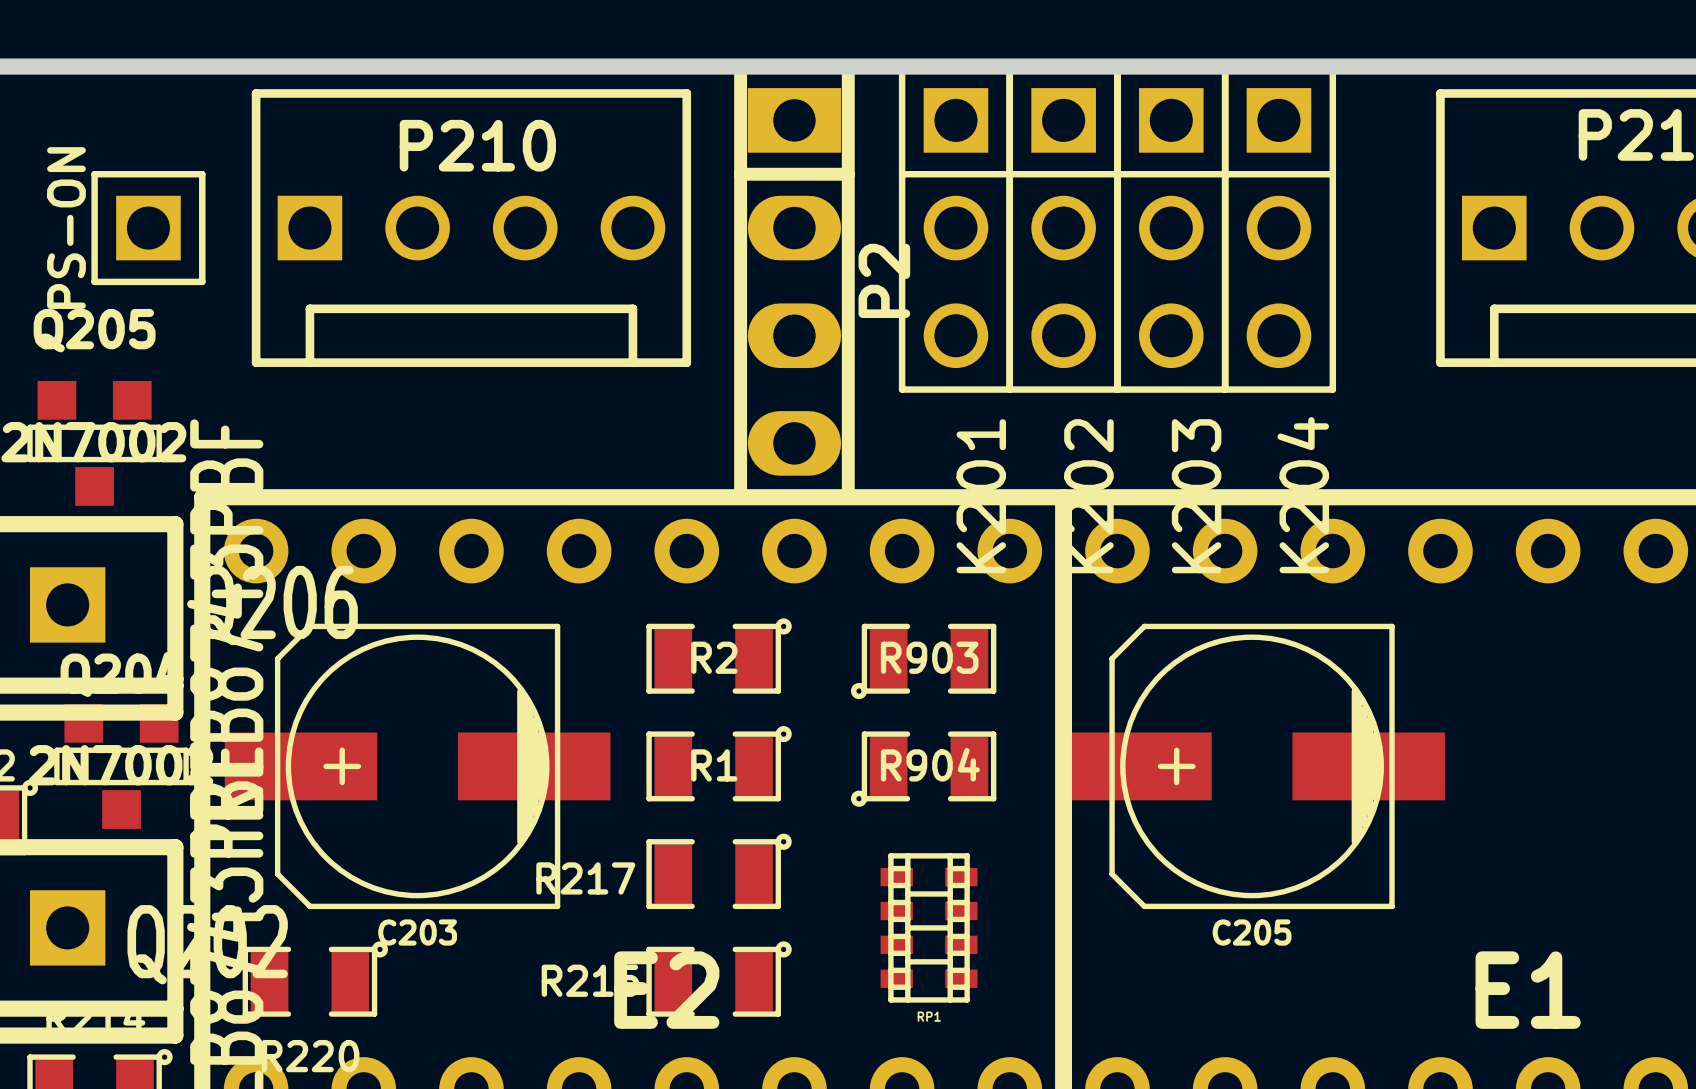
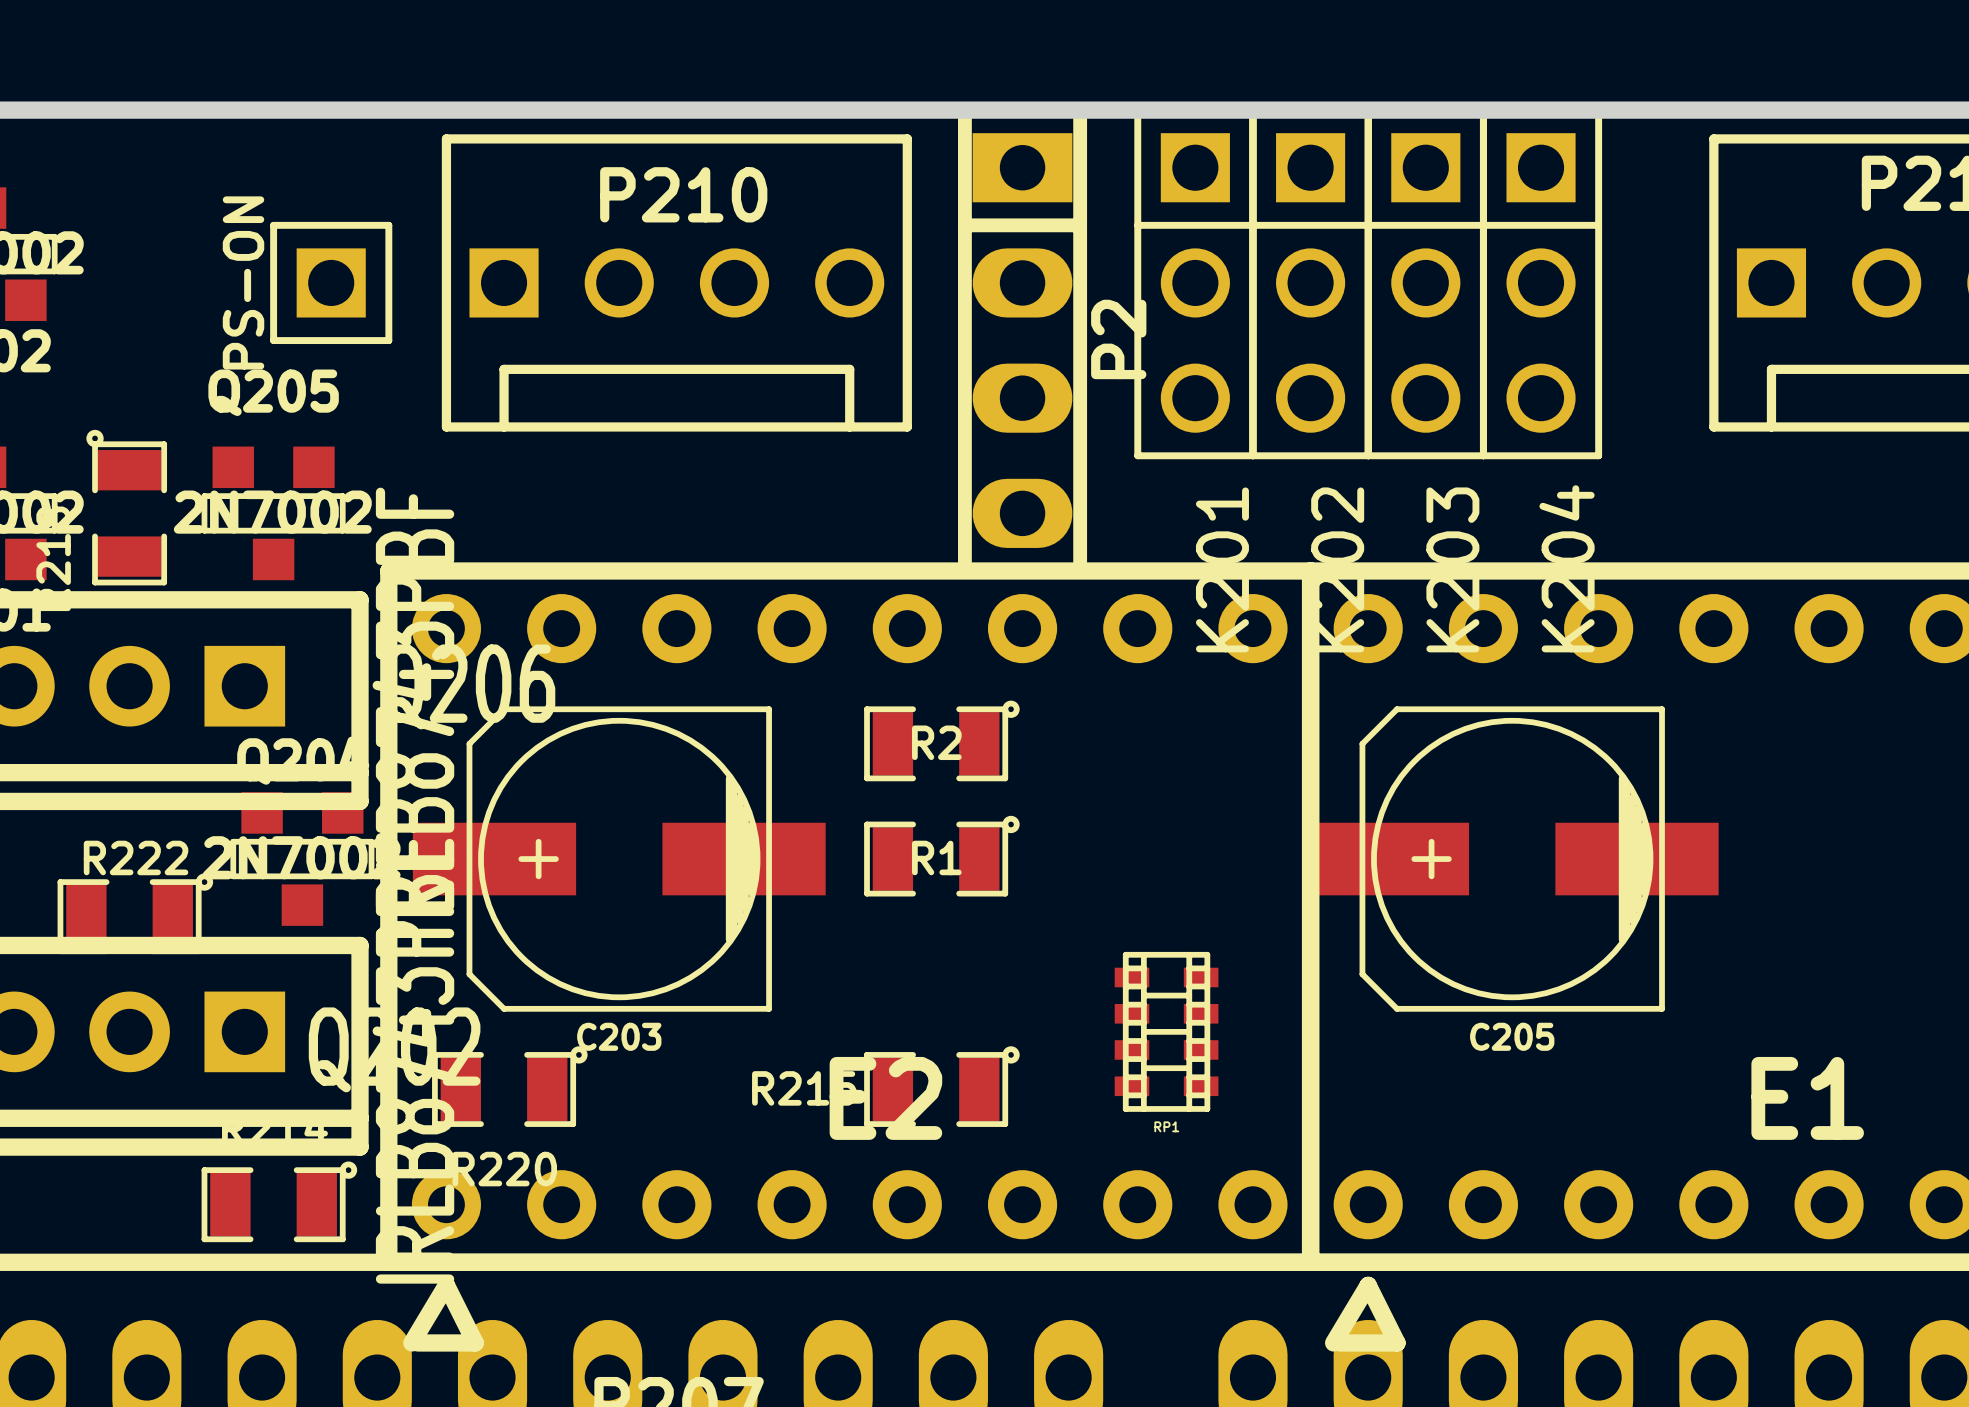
R903: (923, 661) -> none
R904: (923, 769) -> none
R217: (719, 871) -> none

